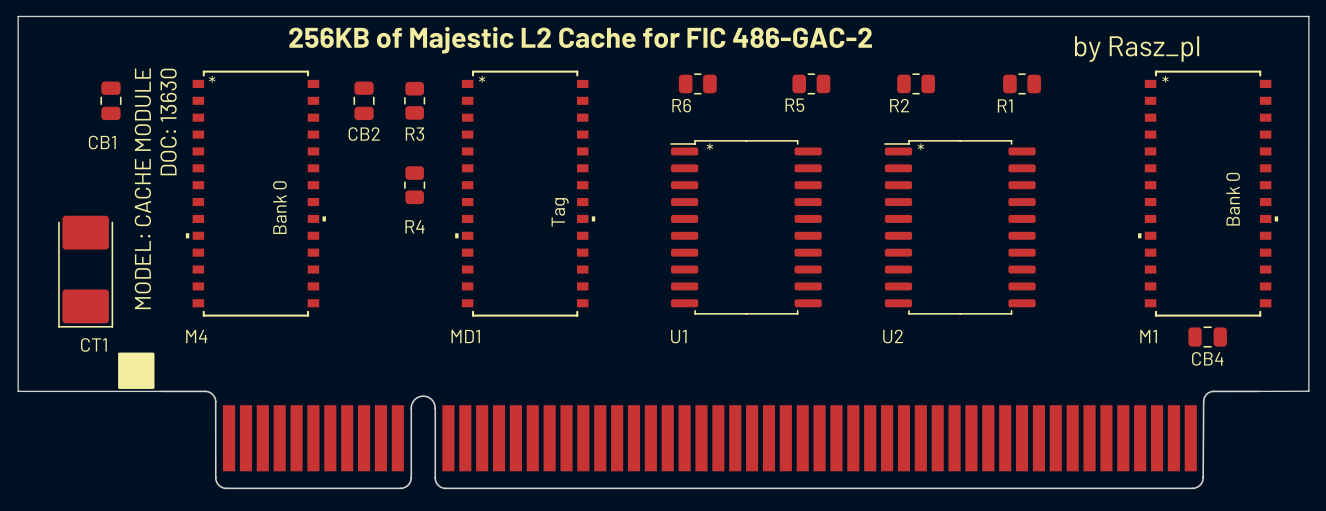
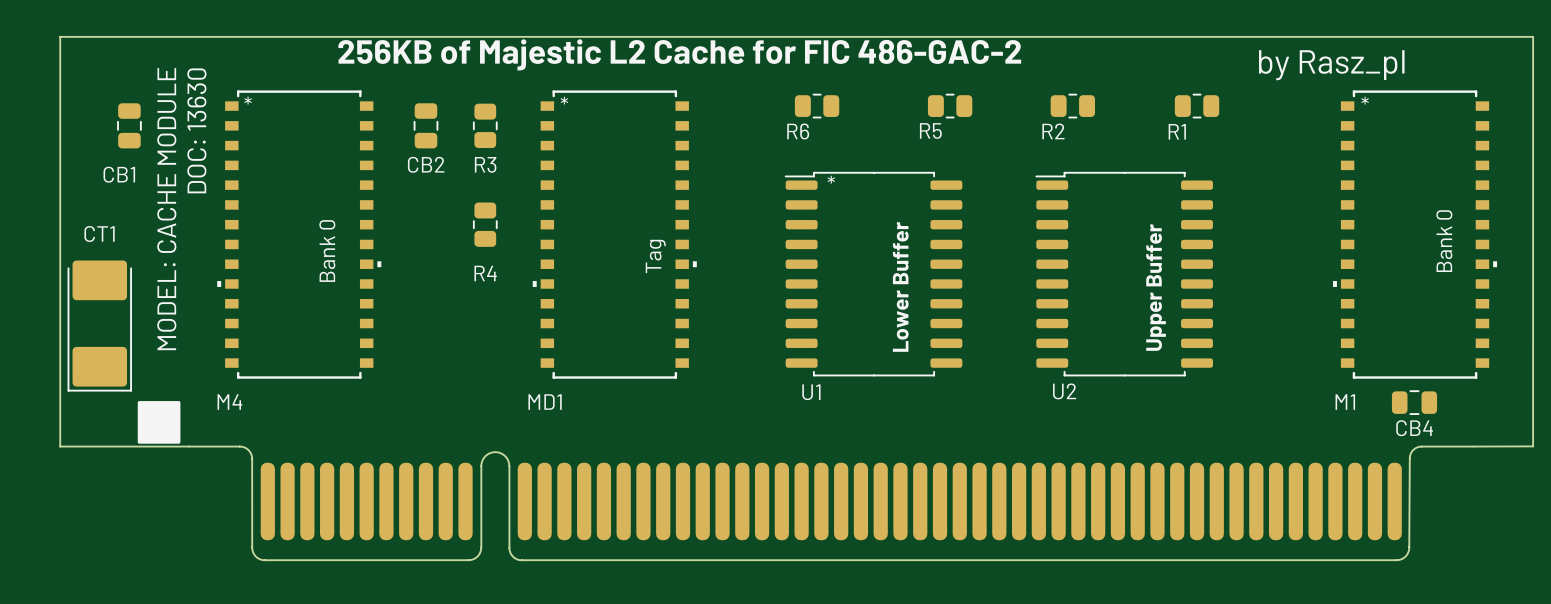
board edge: (1308, 24) (1308, 16) (18, 16) (18, 391) (161, 391) -> (1533, 36) (60, 36) (60, 446) (188, 446)
text position: DOC: 13630 (168, 121) -> DOC: 13630 (196, 130)
U2 text: * (920, 146) -> none
text position: MODEL: CACHE MODULE (142, 188) -> MODEL: CACHE MODULE (166, 209)
text: none -> Lower Buffer (900, 286)
text: none -> Upper Buffer (1156, 287)
U1 name position: U1 (678, 336) -> U1 (811, 392)
U2 name position: U2 (893, 336) -> U2 (1064, 391)
CT1 name position: CT1 (93, 344) -> CT1 (99, 234)
drawing position: (136, 370) -> (159, 422)
board edge: (1308, 374) (1308, 391) (1258, 391) -> (1533, 446) (1473, 446)
part: none -> (831, 503)
part: (709, 439) -> none

